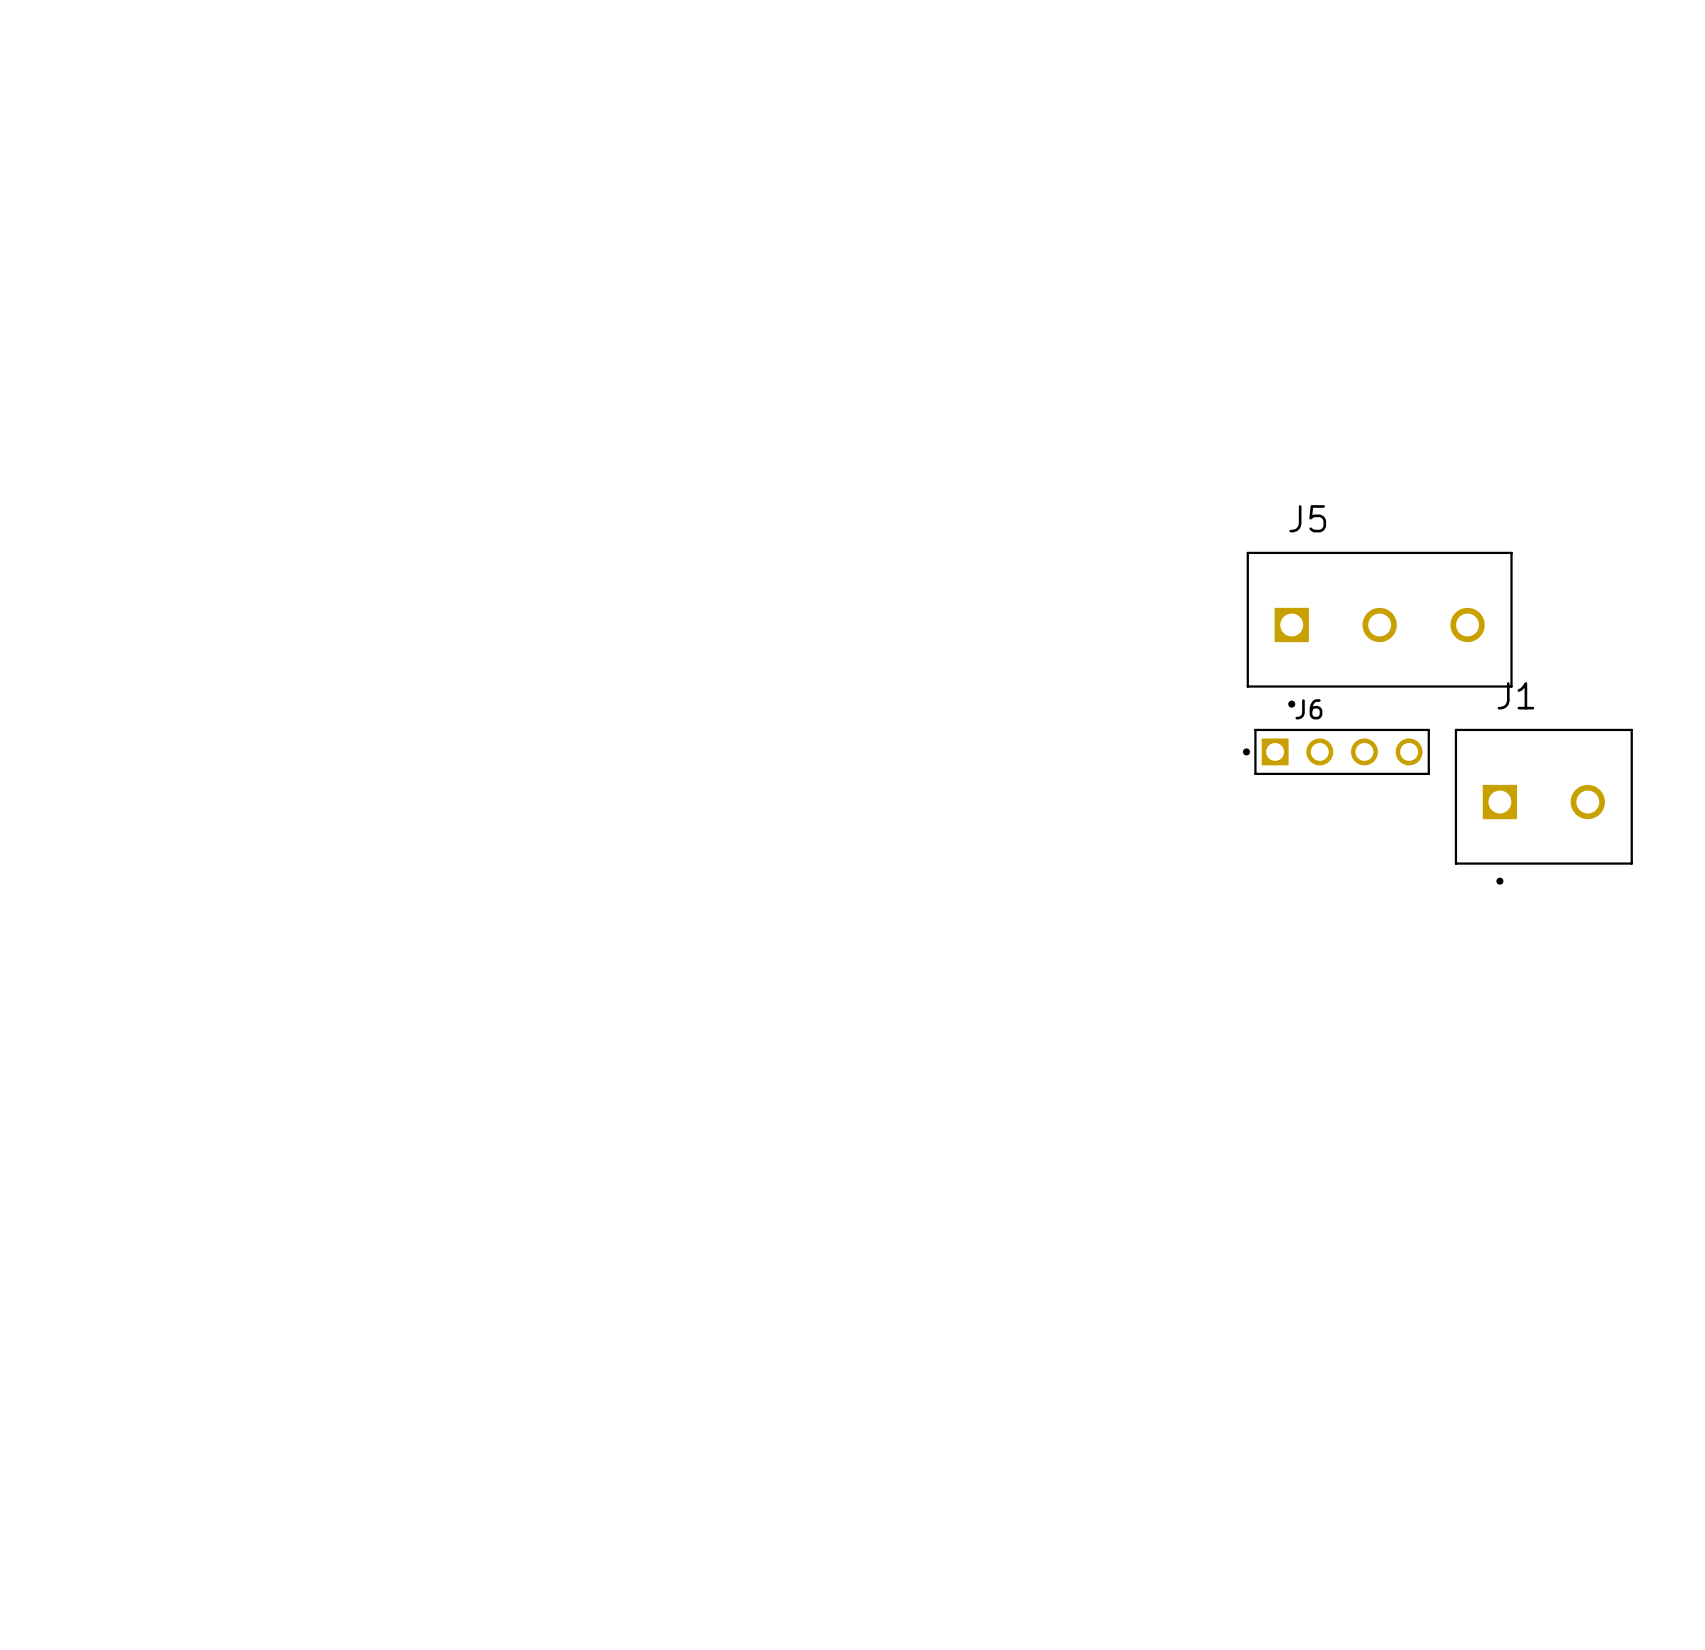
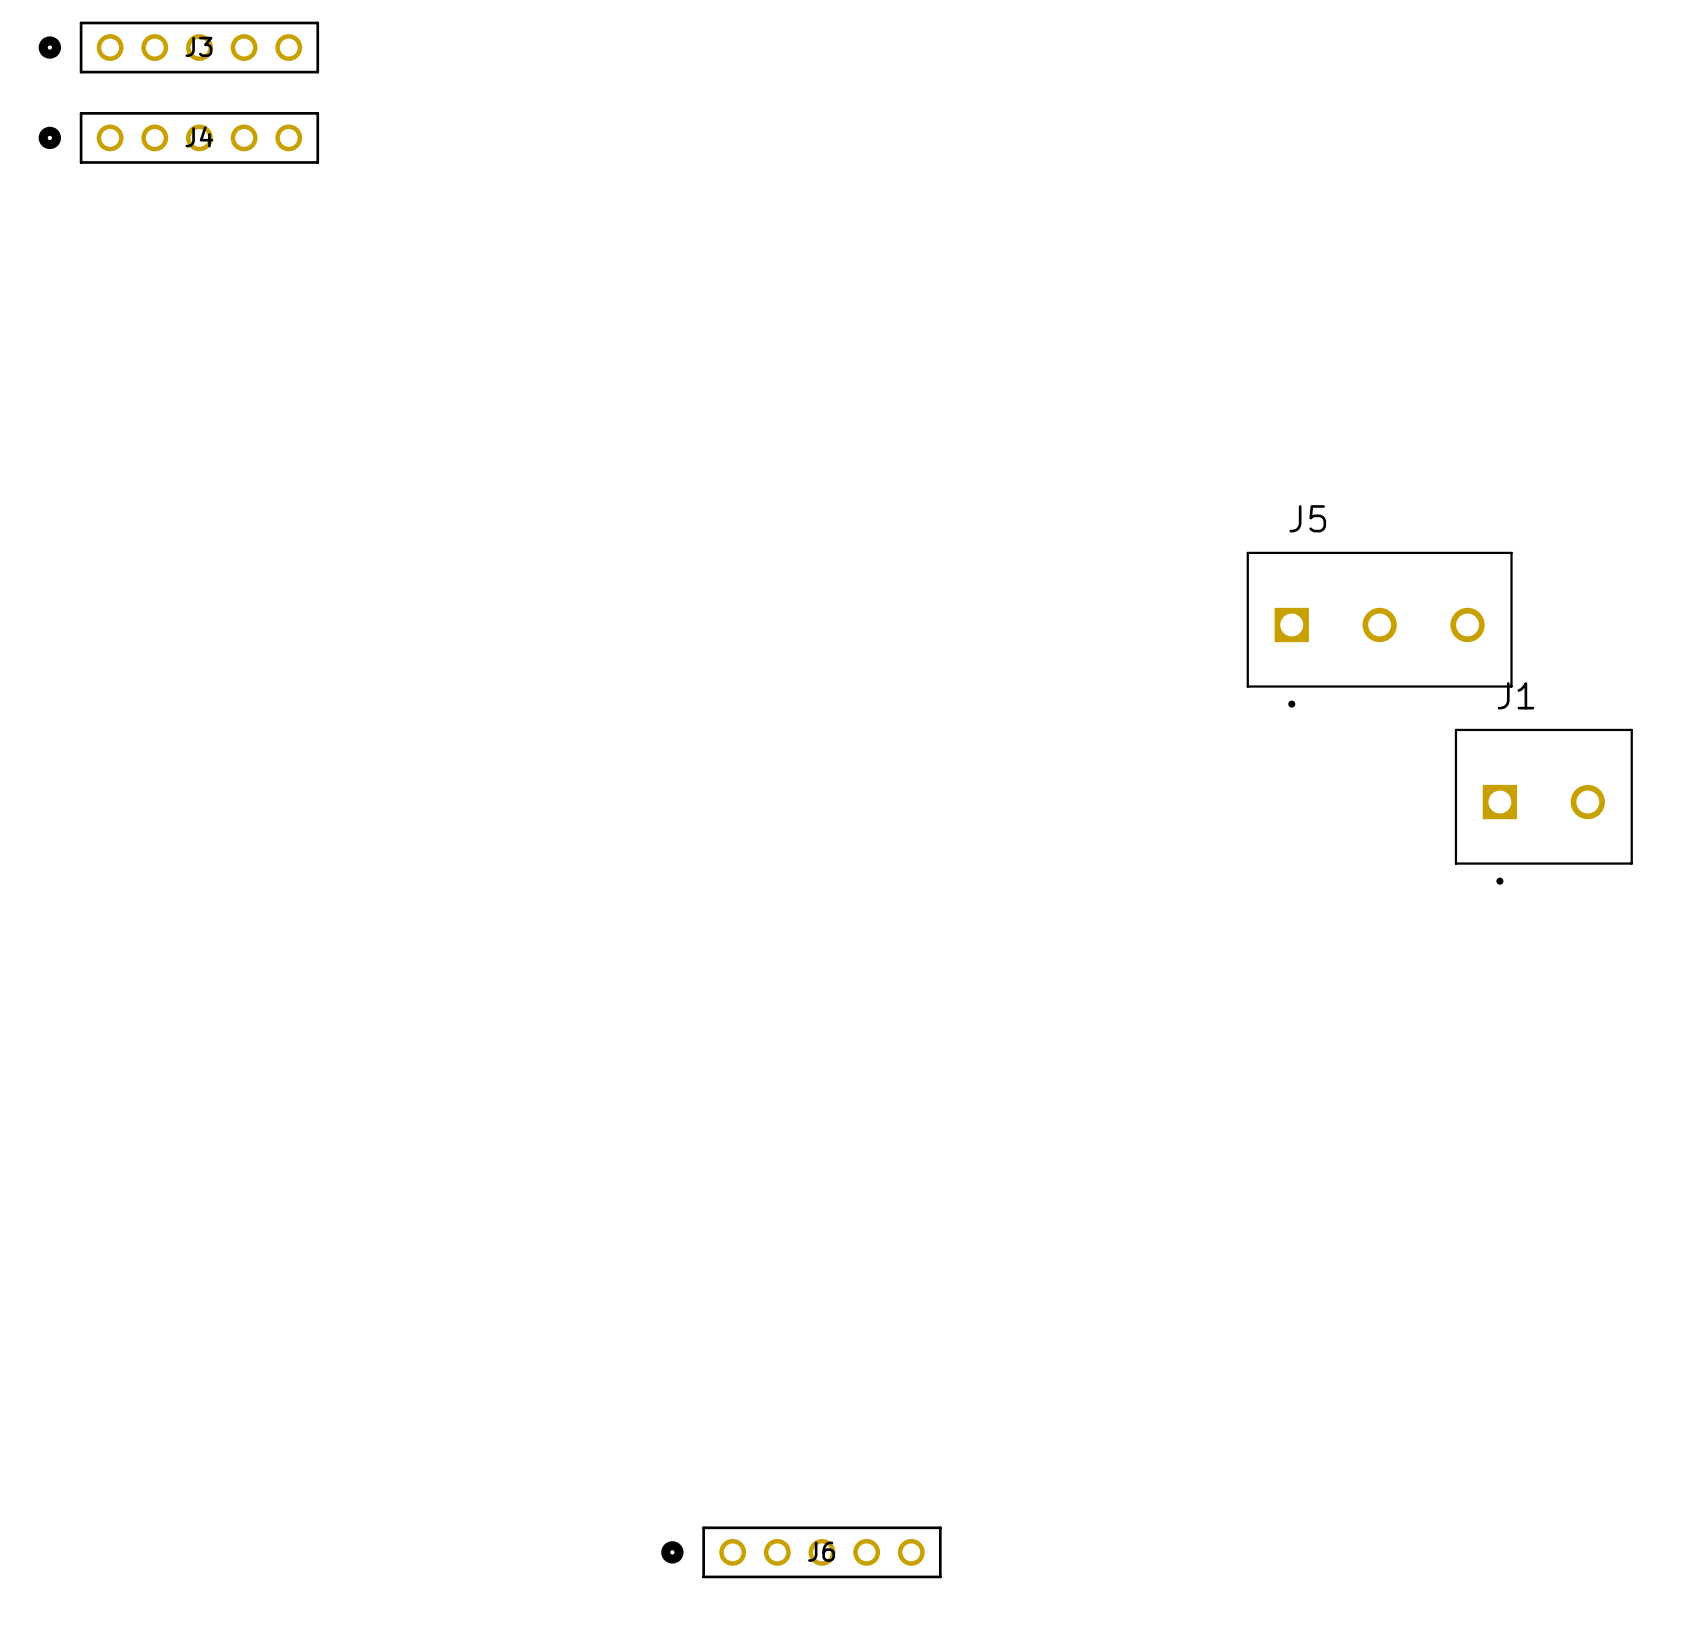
J3: none -> (178, 47)
J4: none -> (178, 137)
J6 name position: J6 (1308, 709) -> J6 (821, 1551)
J6 footprint: [1242, 728, 1430, 776] -> [661, 1526, 942, 1579]

